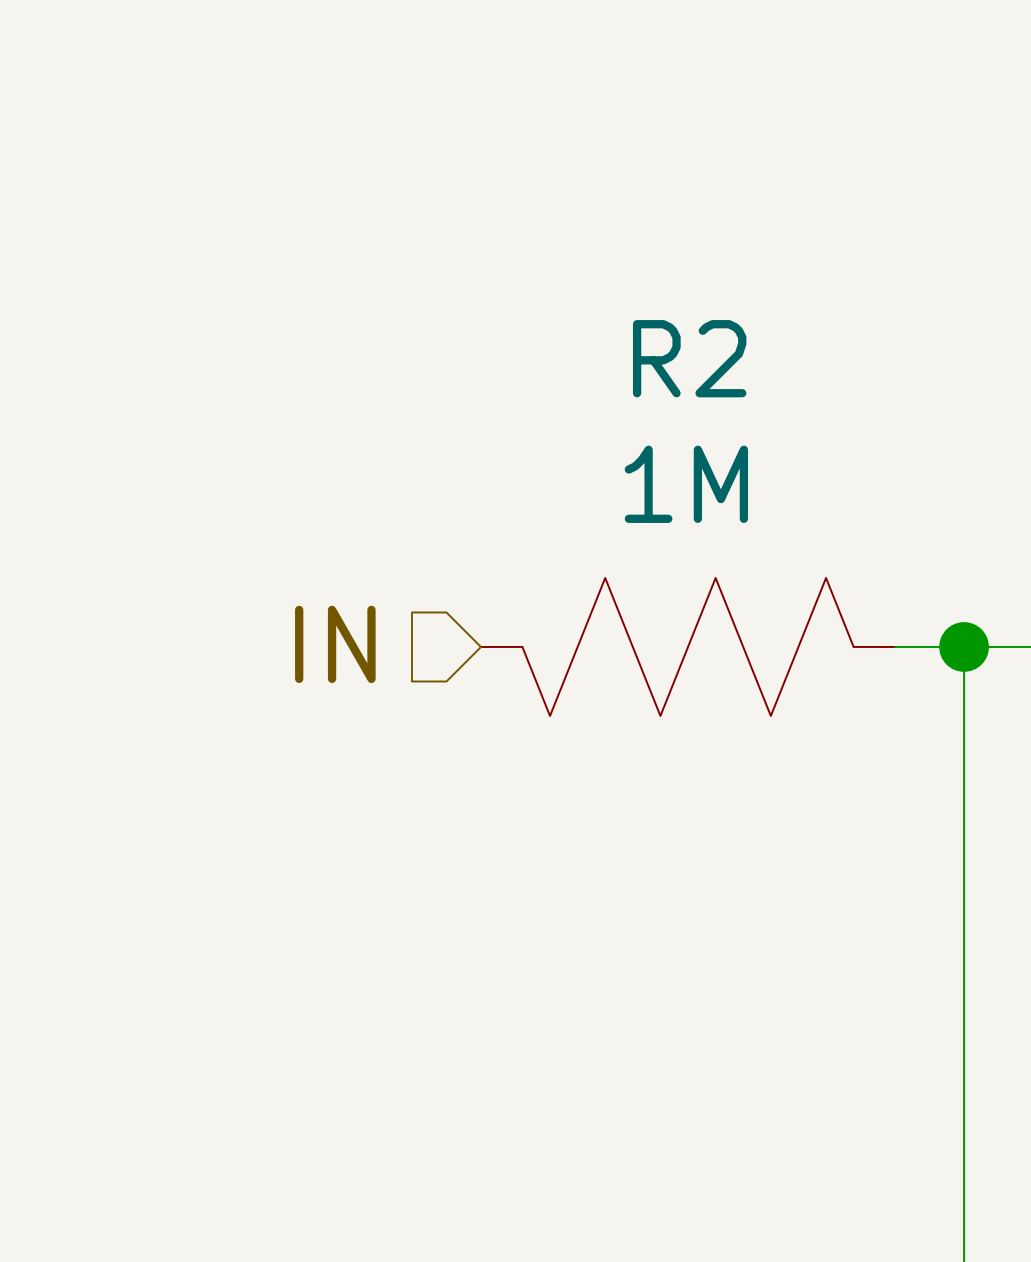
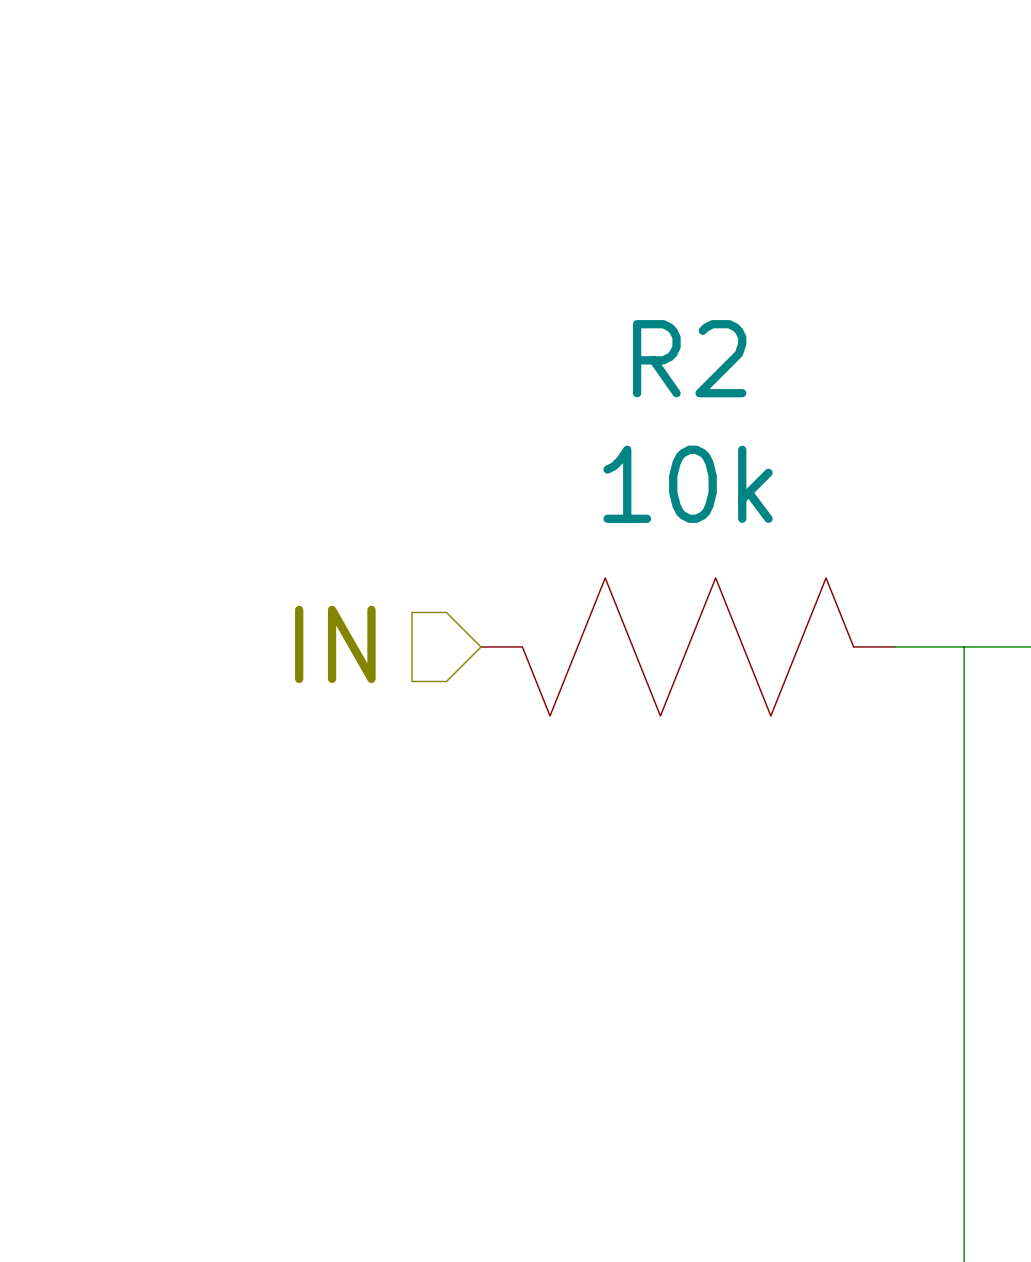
R2 value: 1M (686, 484) -> 10k (688, 484)
junction: (964, 646) -> none

